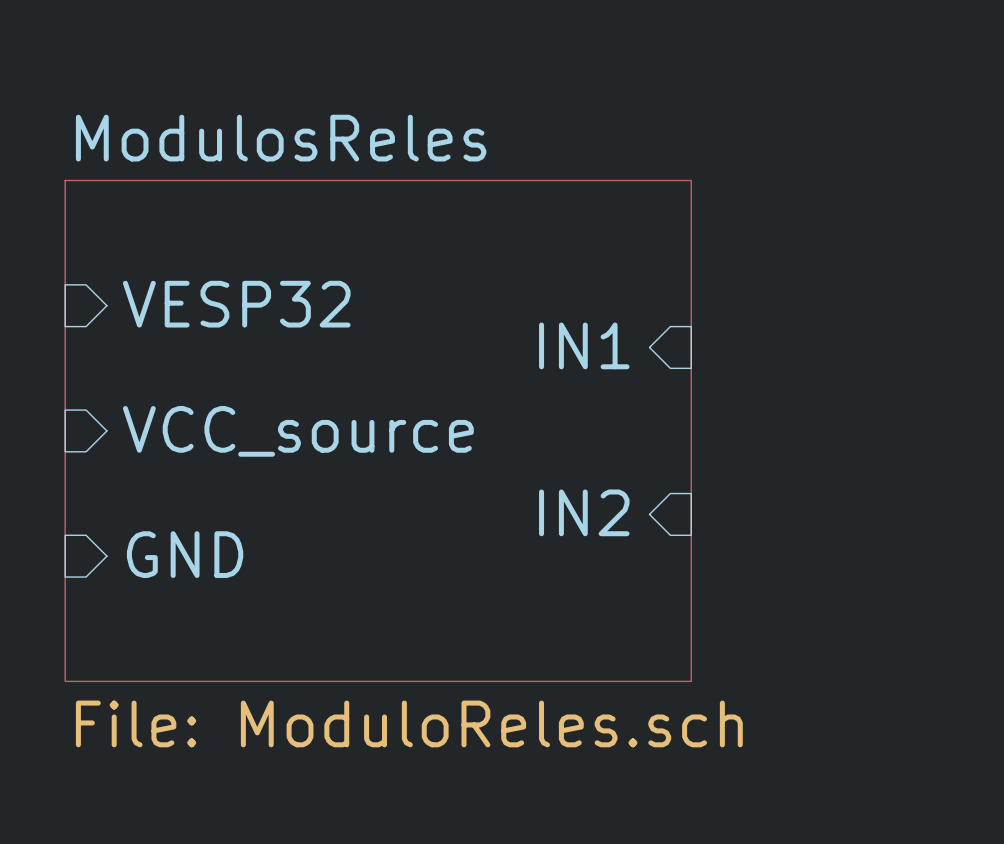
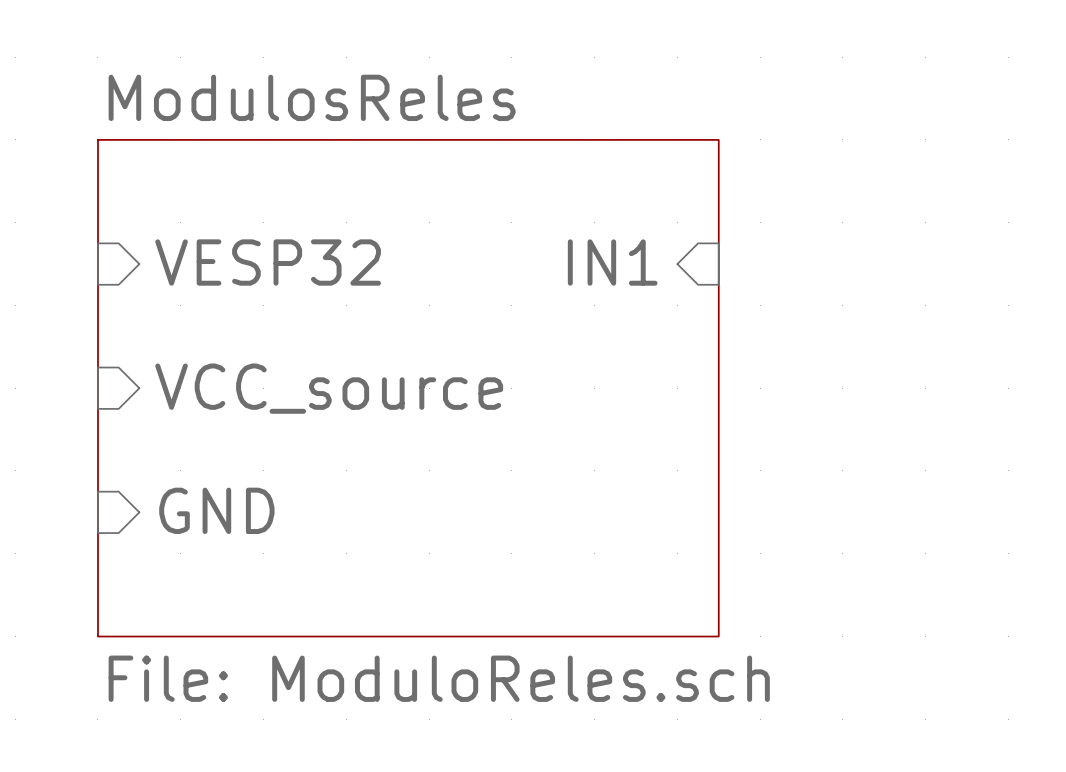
sheet pin position: IN1 (584, 345) -> IN1 (612, 262)
sheet pin: IN2 (584, 512) -> none

